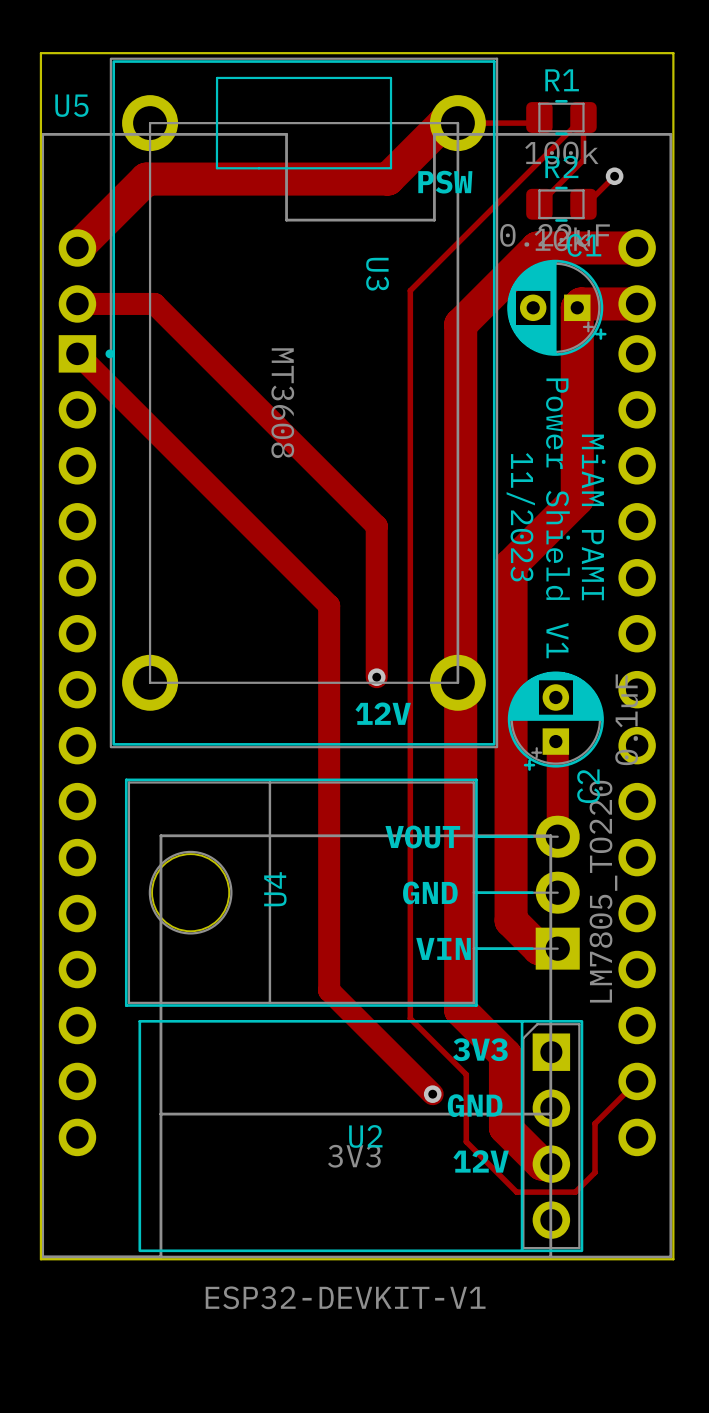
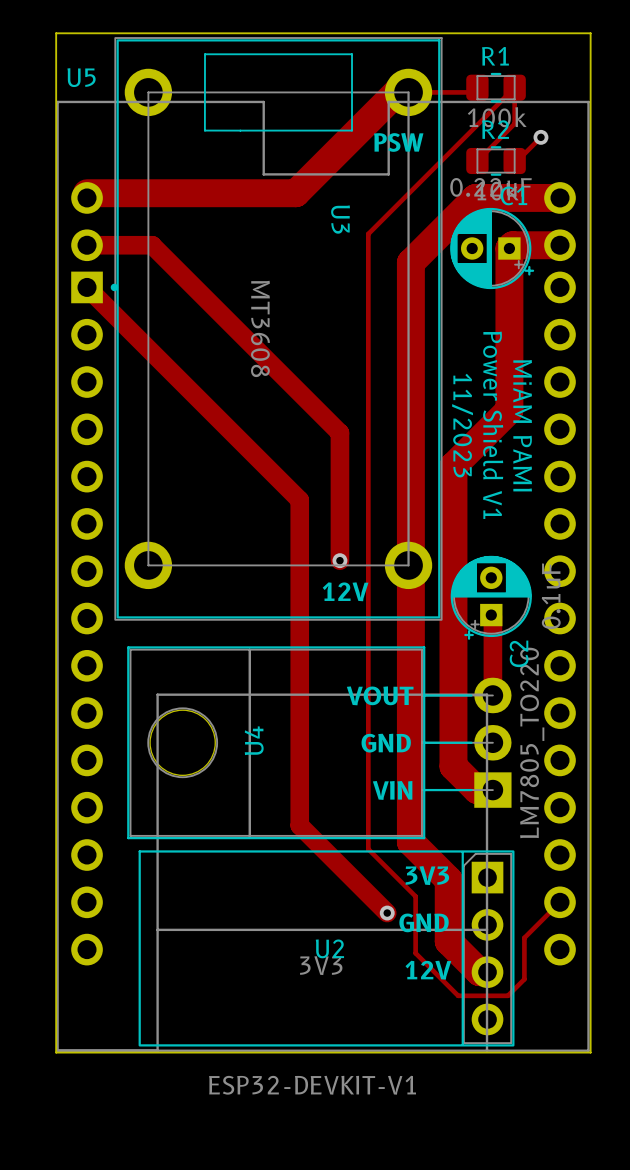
track: (387, 179) (146, 179) (77, 247) -> (349, 139) (295, 193) (87, 193)

